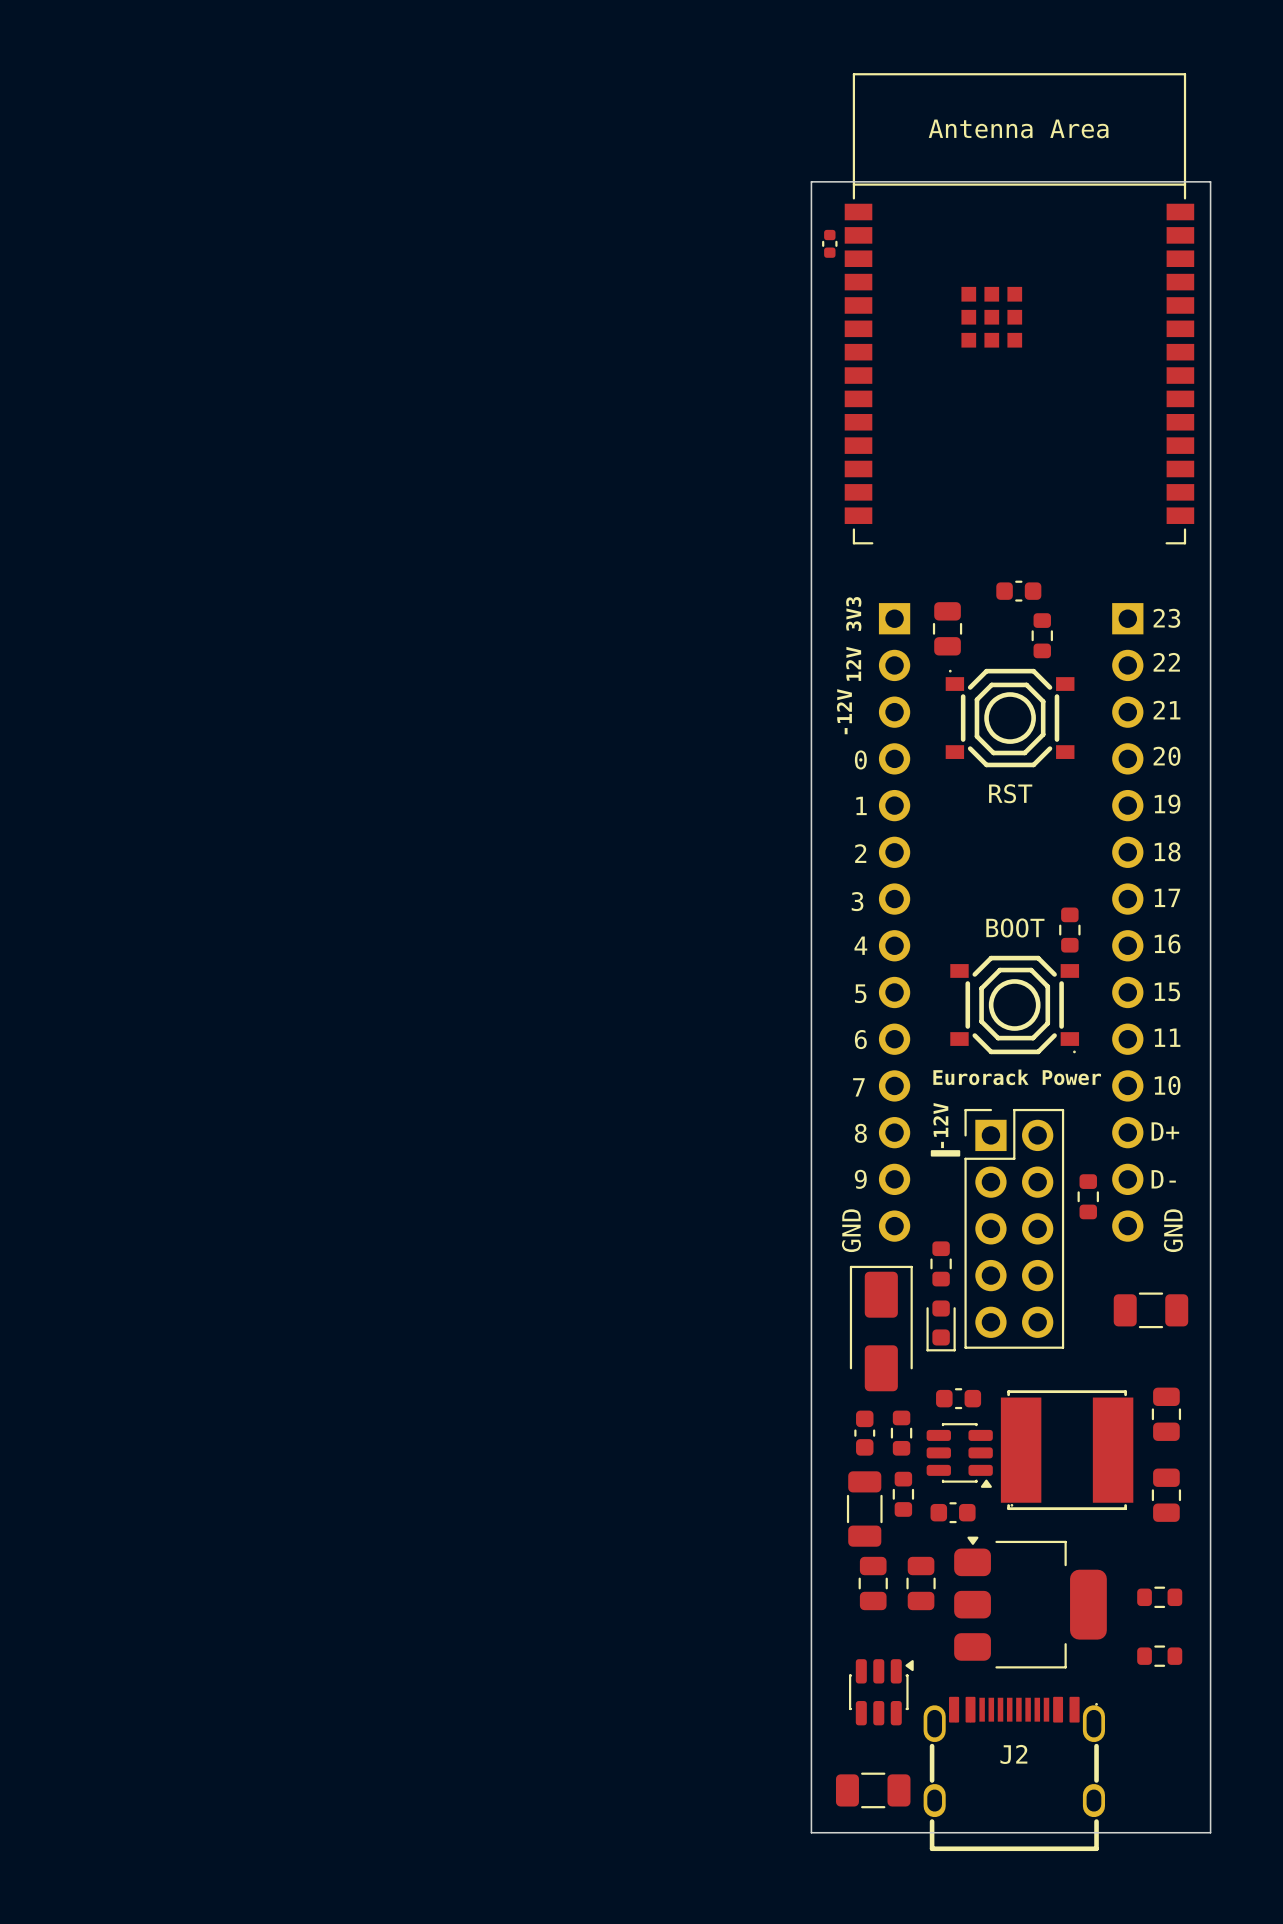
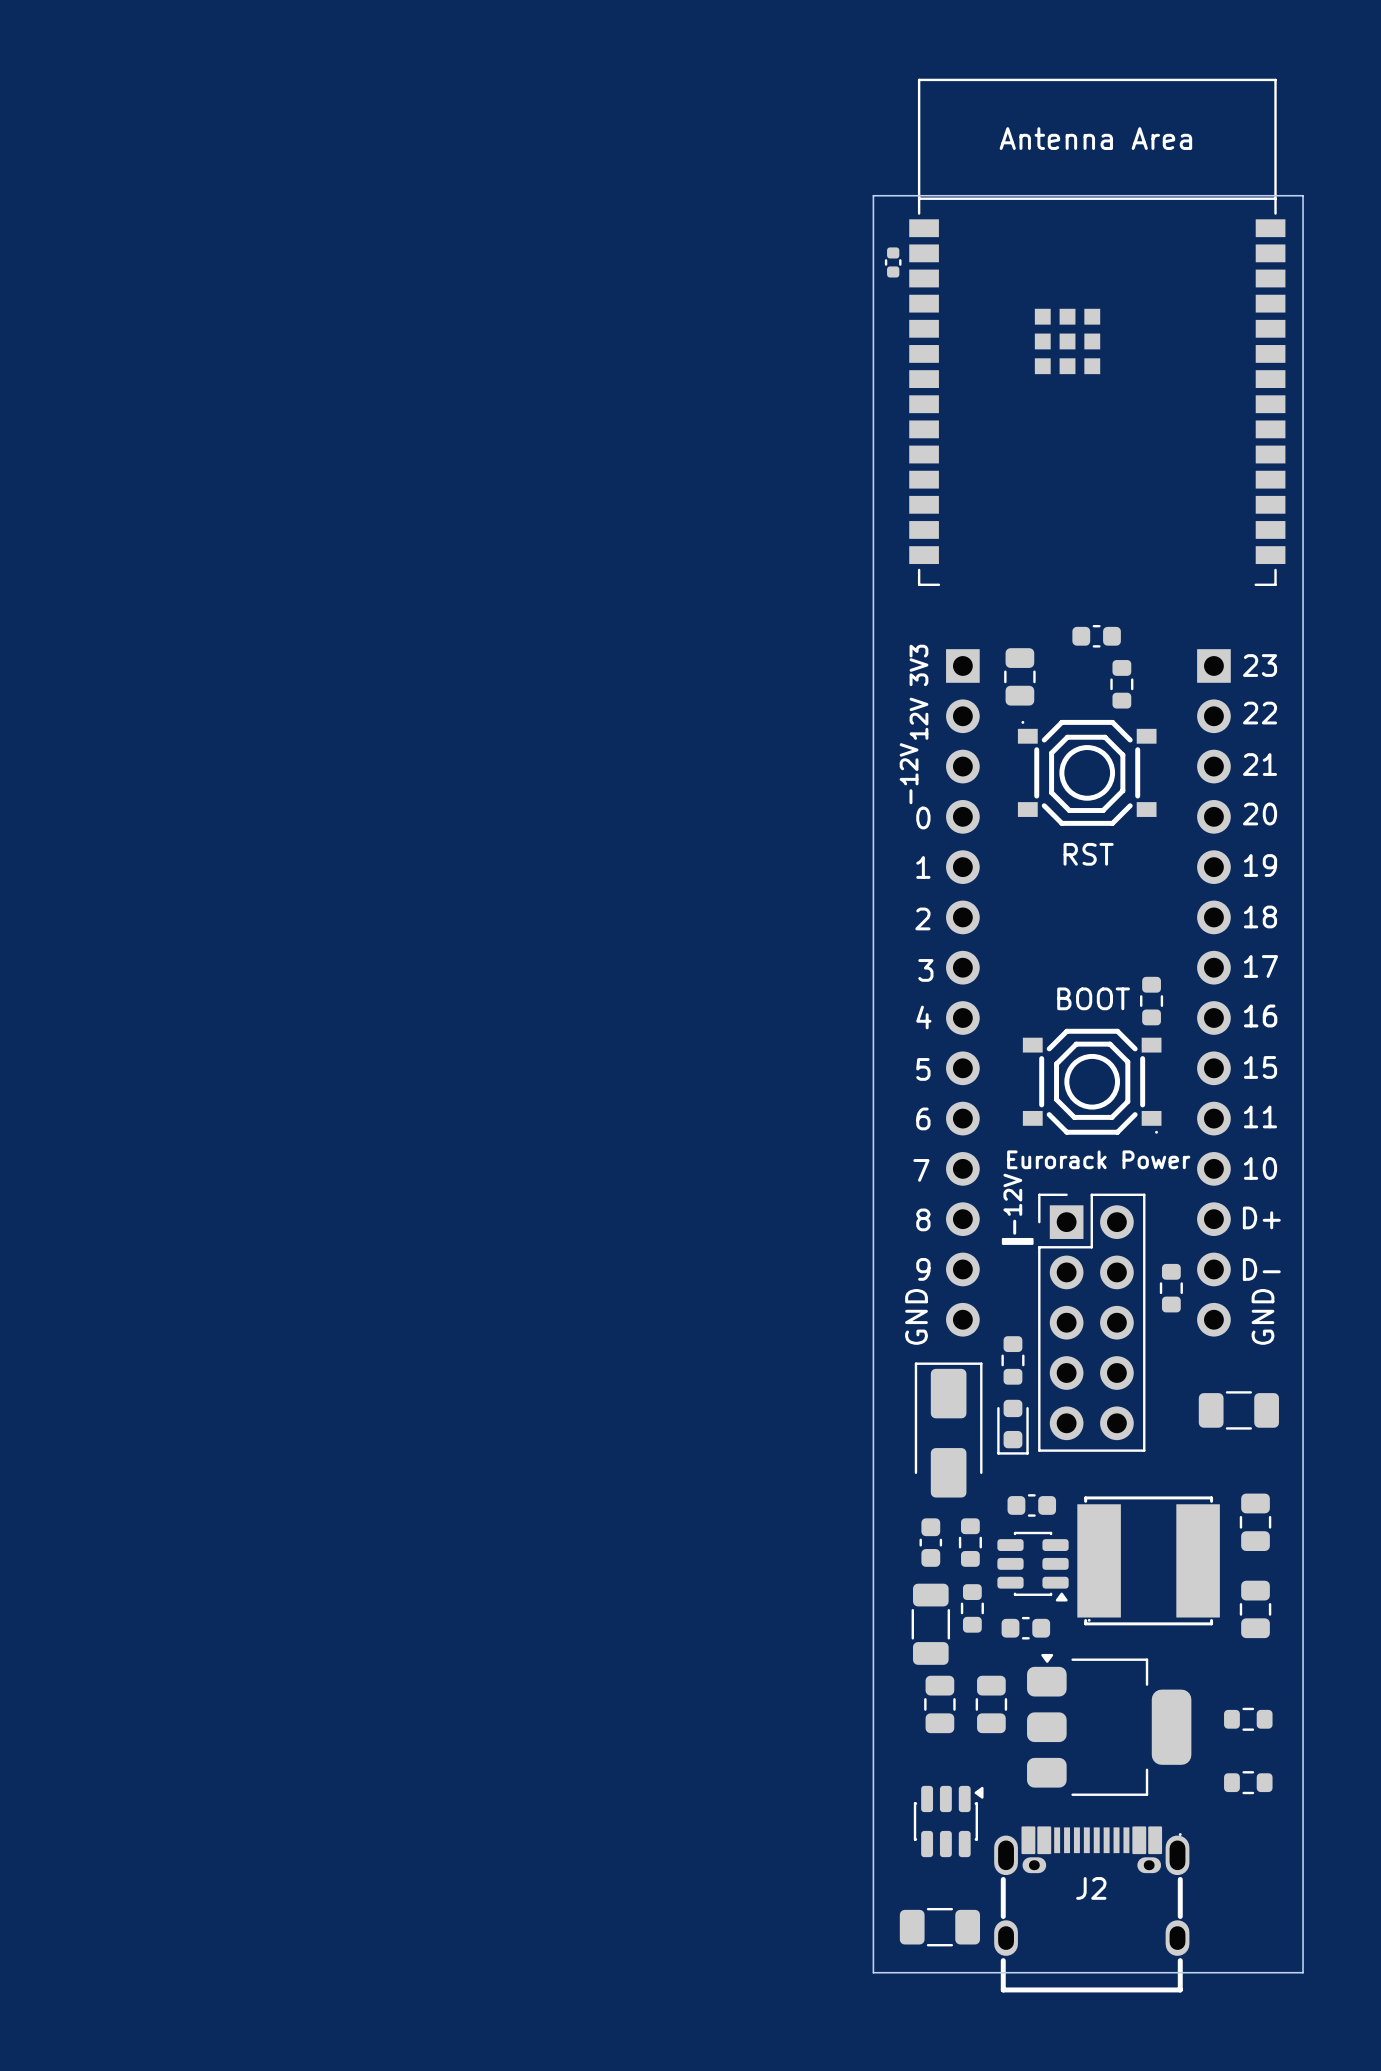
J2 footprint: [923, 1696, 1105, 1852] -> [994, 1826, 1190, 1993]

